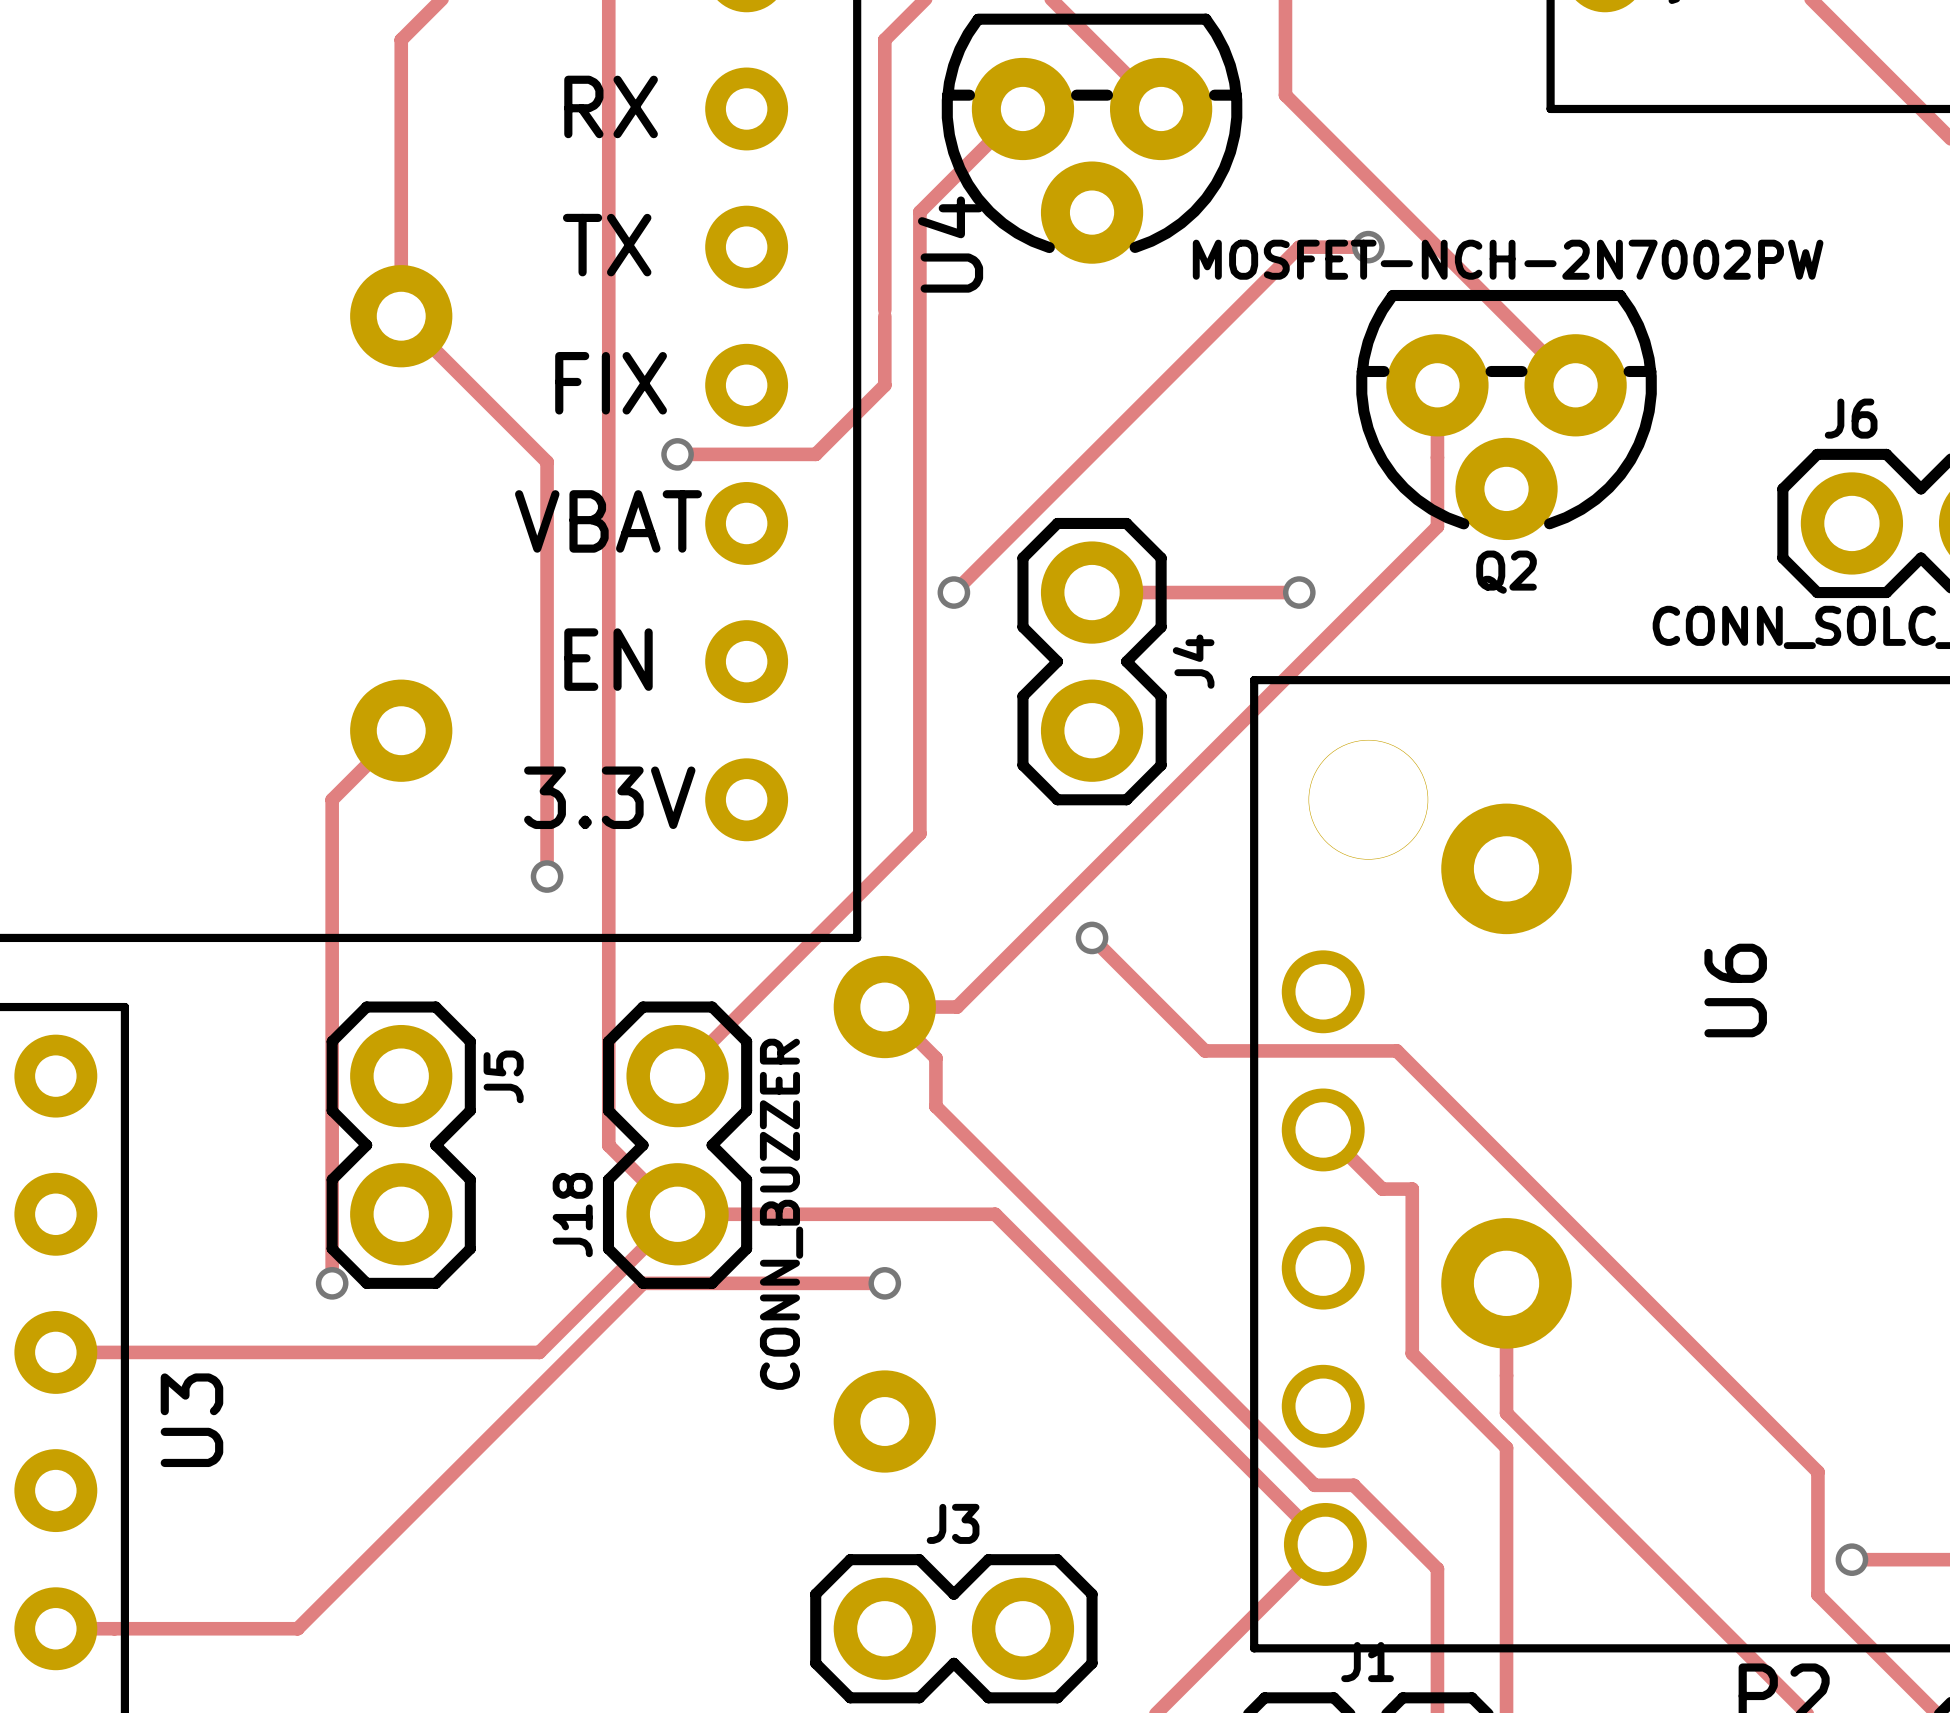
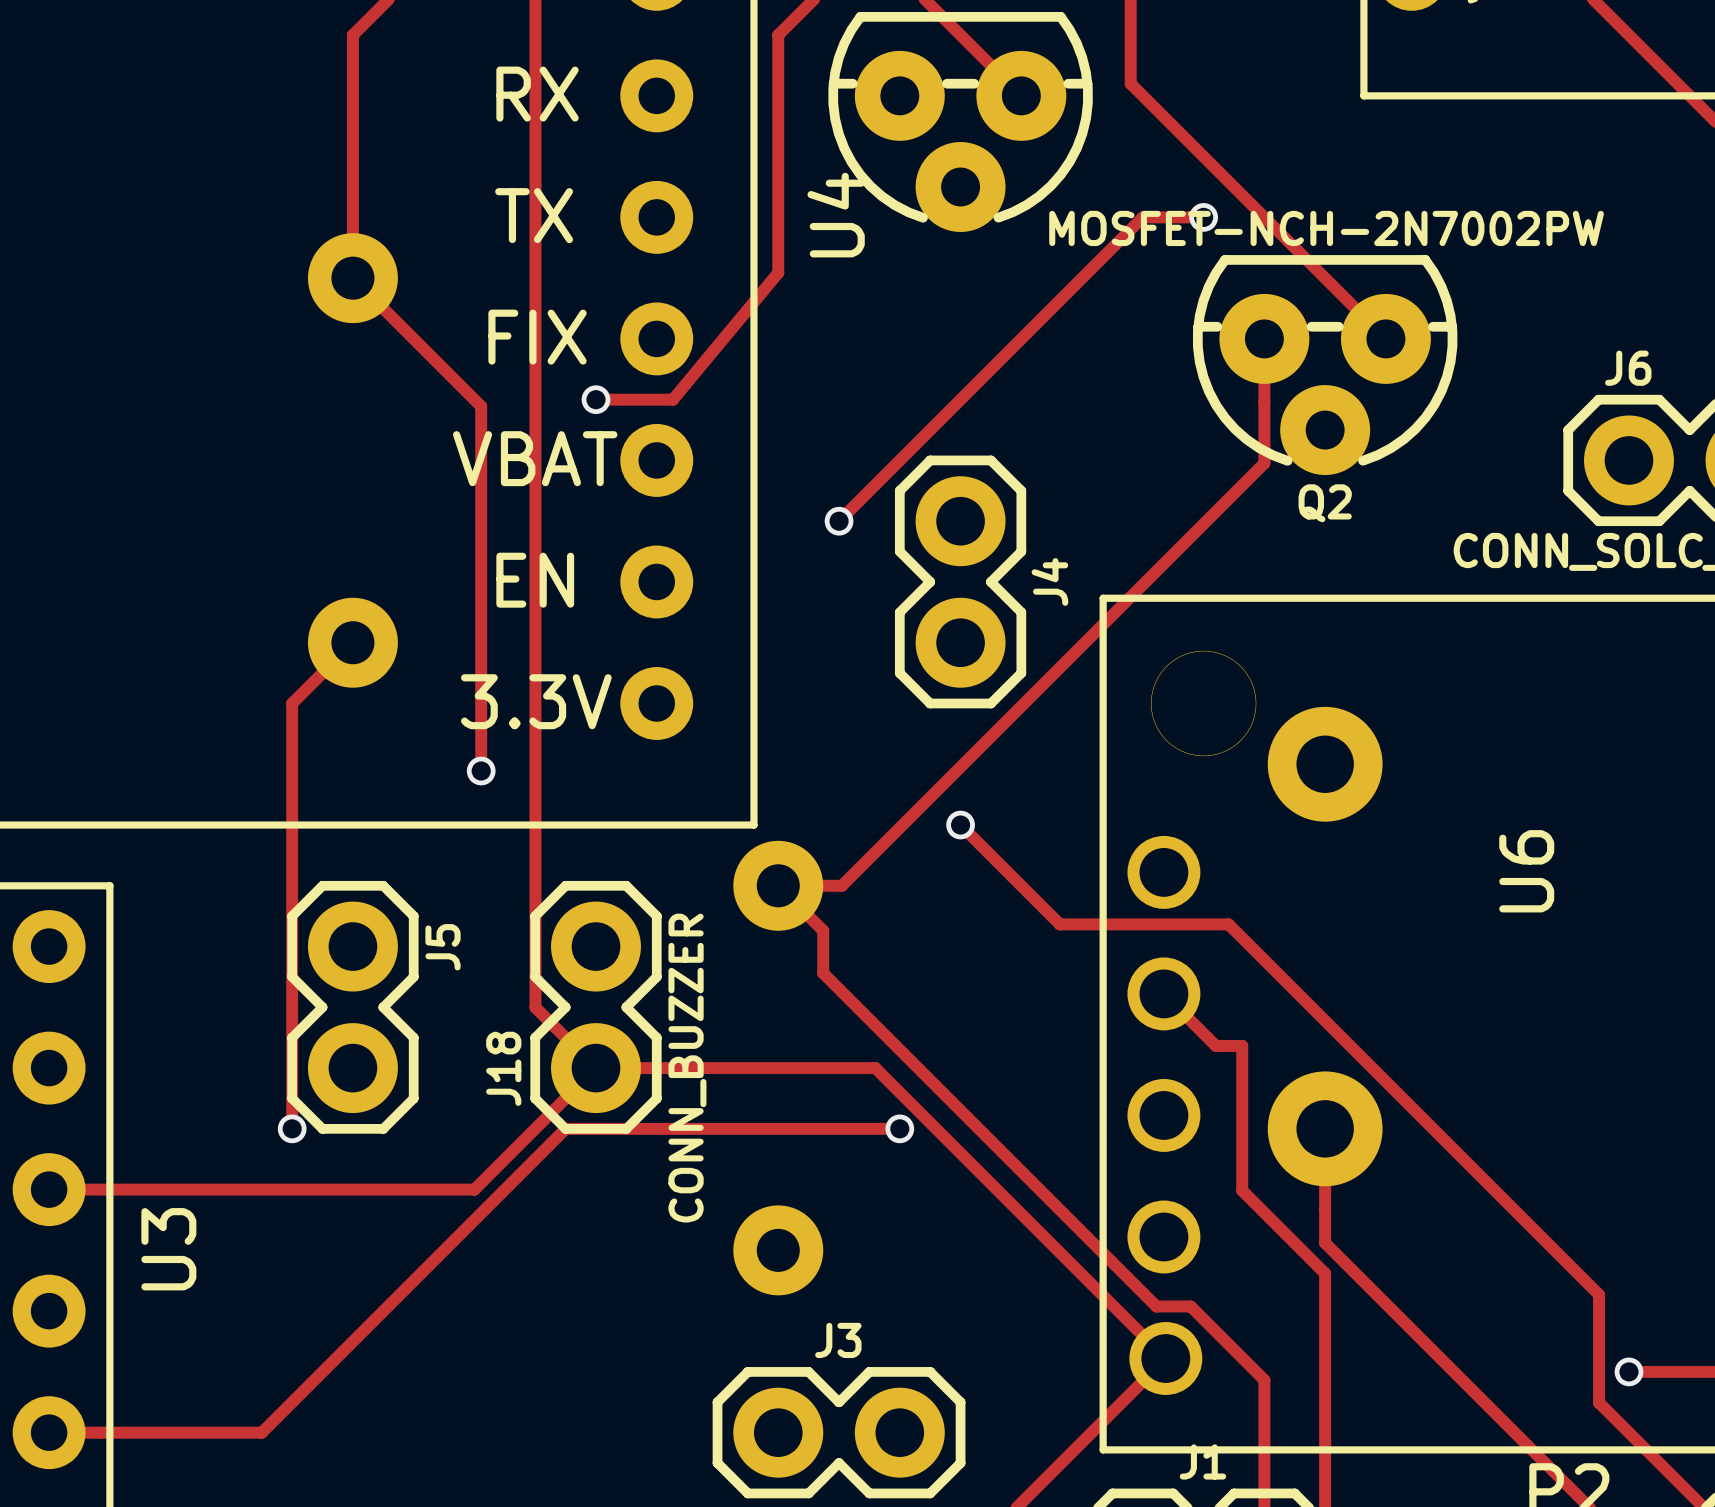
track: (1022, 108) (919, 212) (919, 833) (677, 1076) -> none
track: (884, 316) (884, 385) (815, 454) (765, 454) -> (778, 272) (672, 399)
track: (1092, 592) (1299, 592) -> none
via: (1299, 592) -> none
track: none -> (778, 1128) (899, 1128)
via position: (884, 1283) -> (899, 1128)

